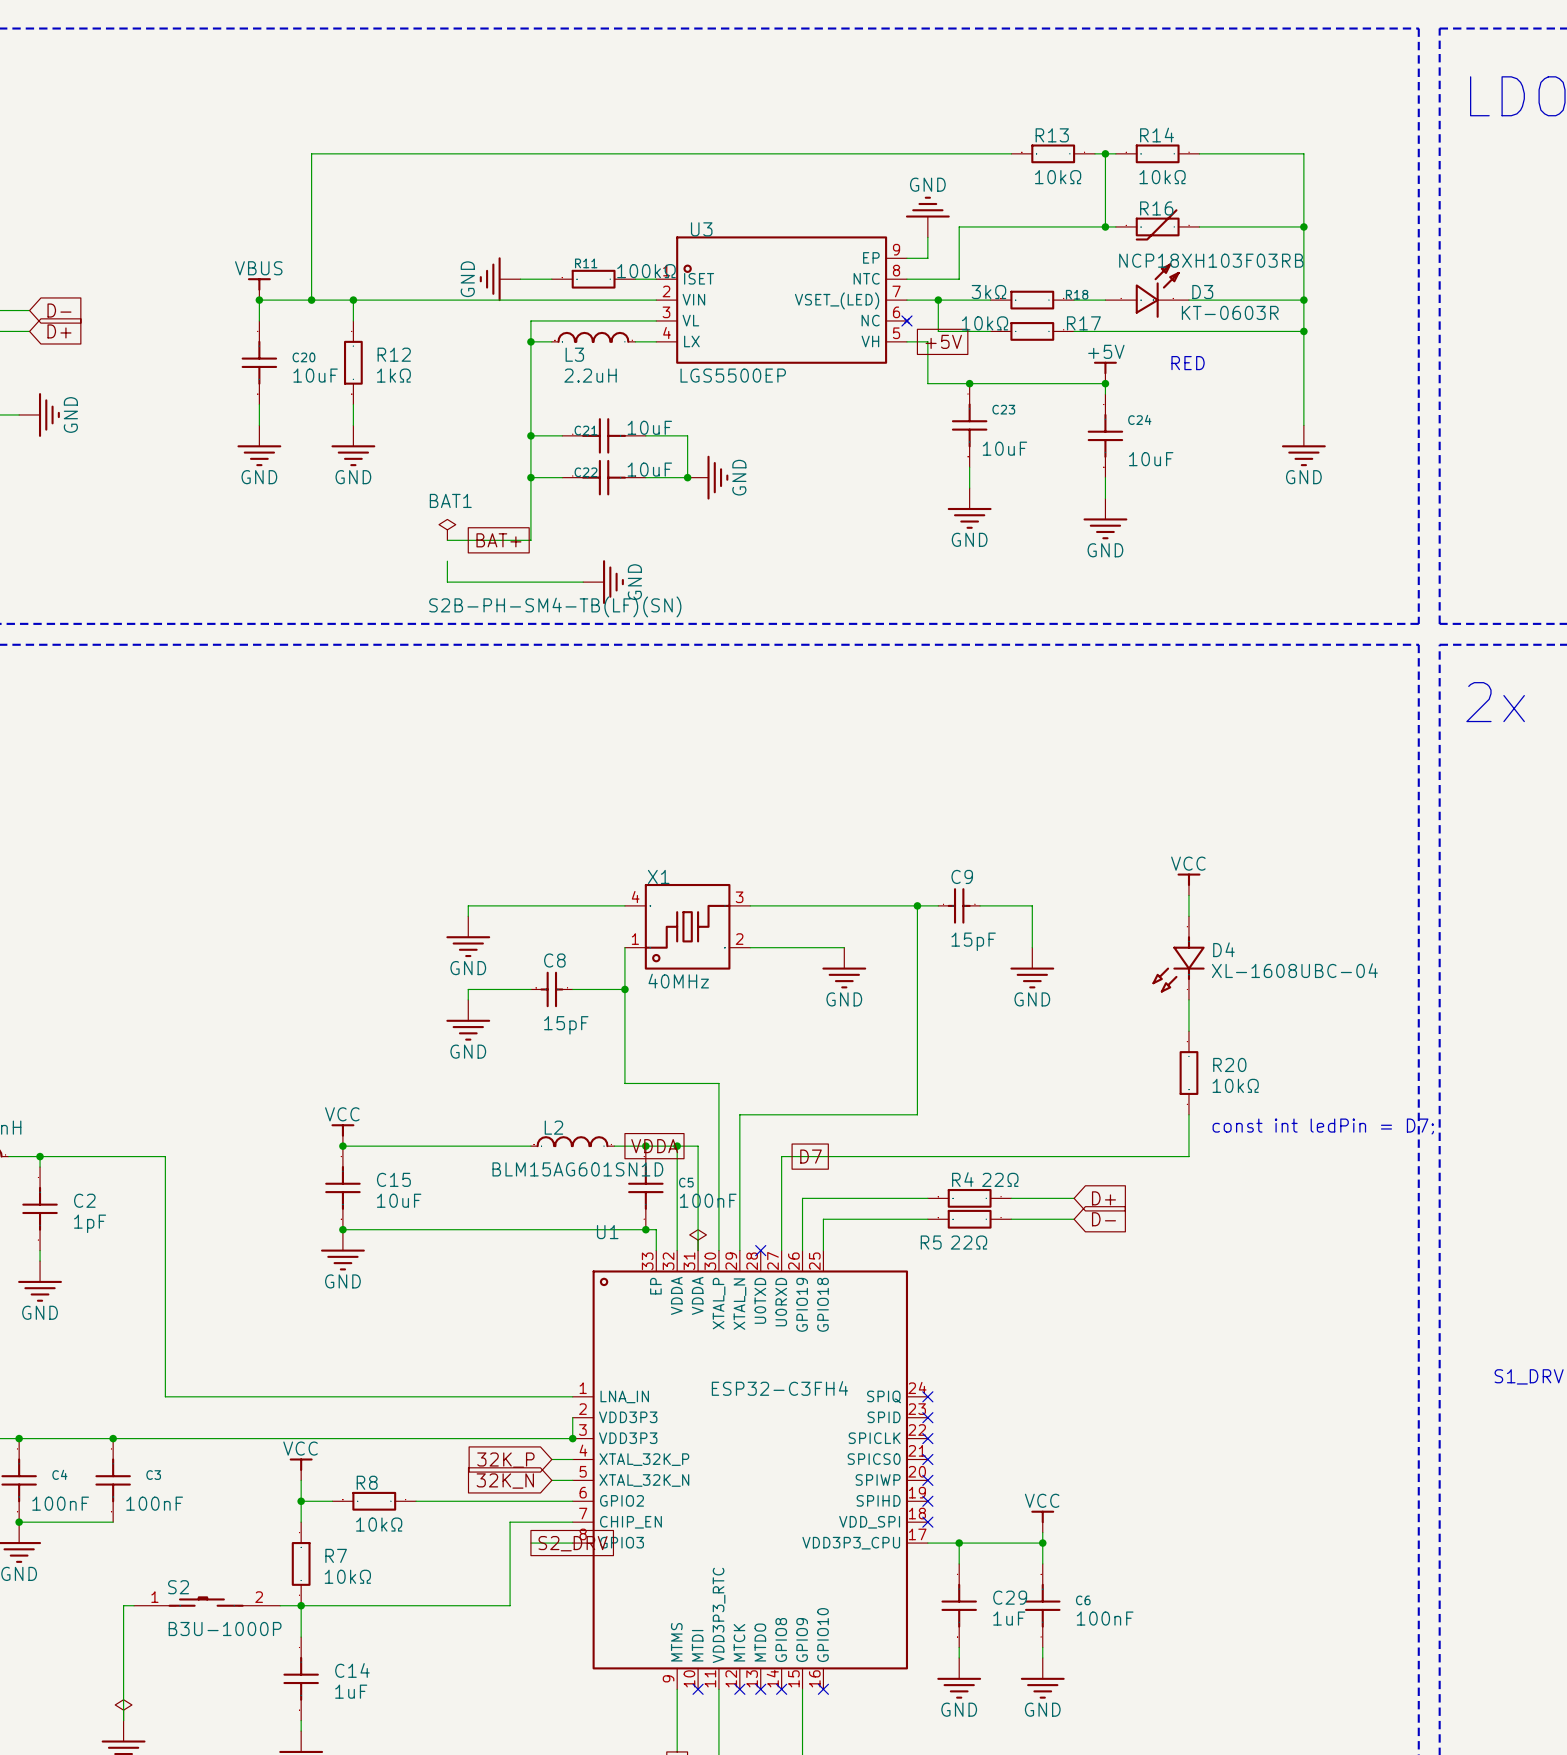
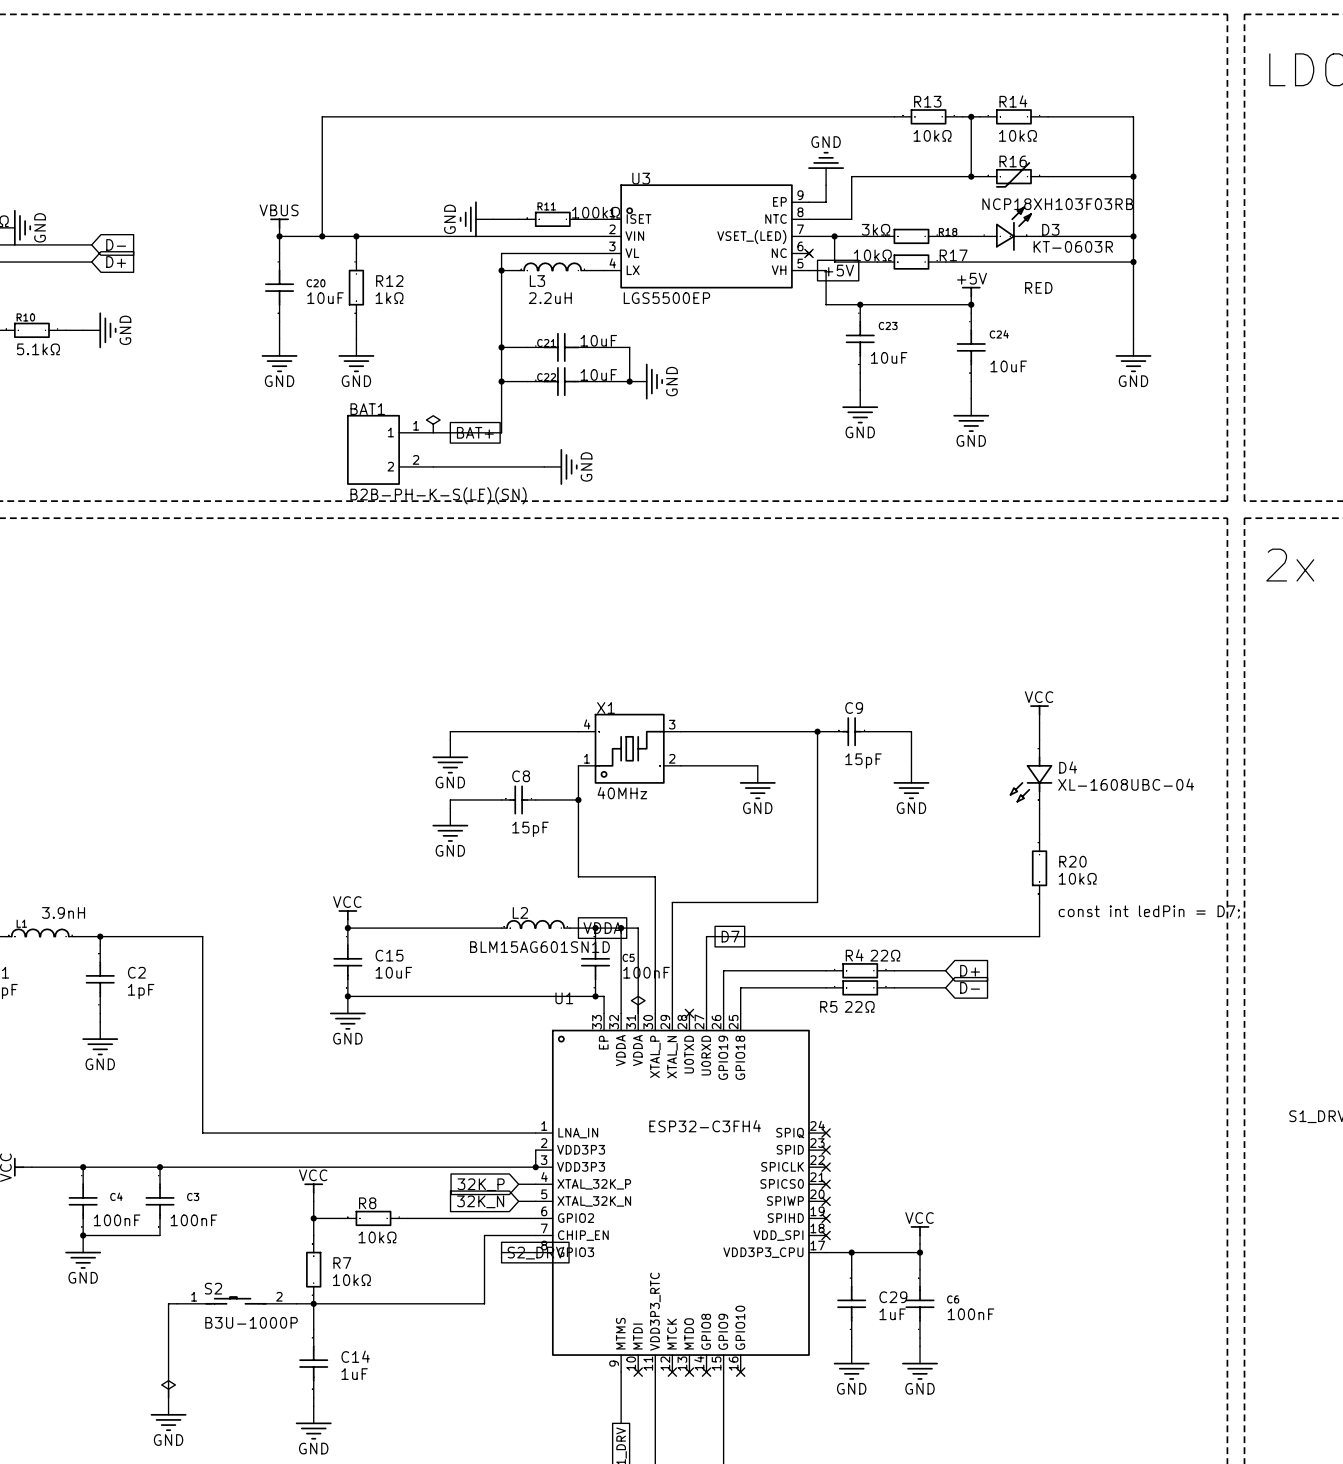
BAT1 symbol: [429, 493, 682, 618] -> [347, 414, 434, 485]
BAT1 name position: BAT1 (450, 500) -> BAT1 (367, 409)
wire: (447, 561) (447, 582) -> none
BAT1 value: S2B-PH-SM4-TB(LF)(SN) (555, 606) -> B2B-PH-K-S(LF)(SN) (438, 495)

